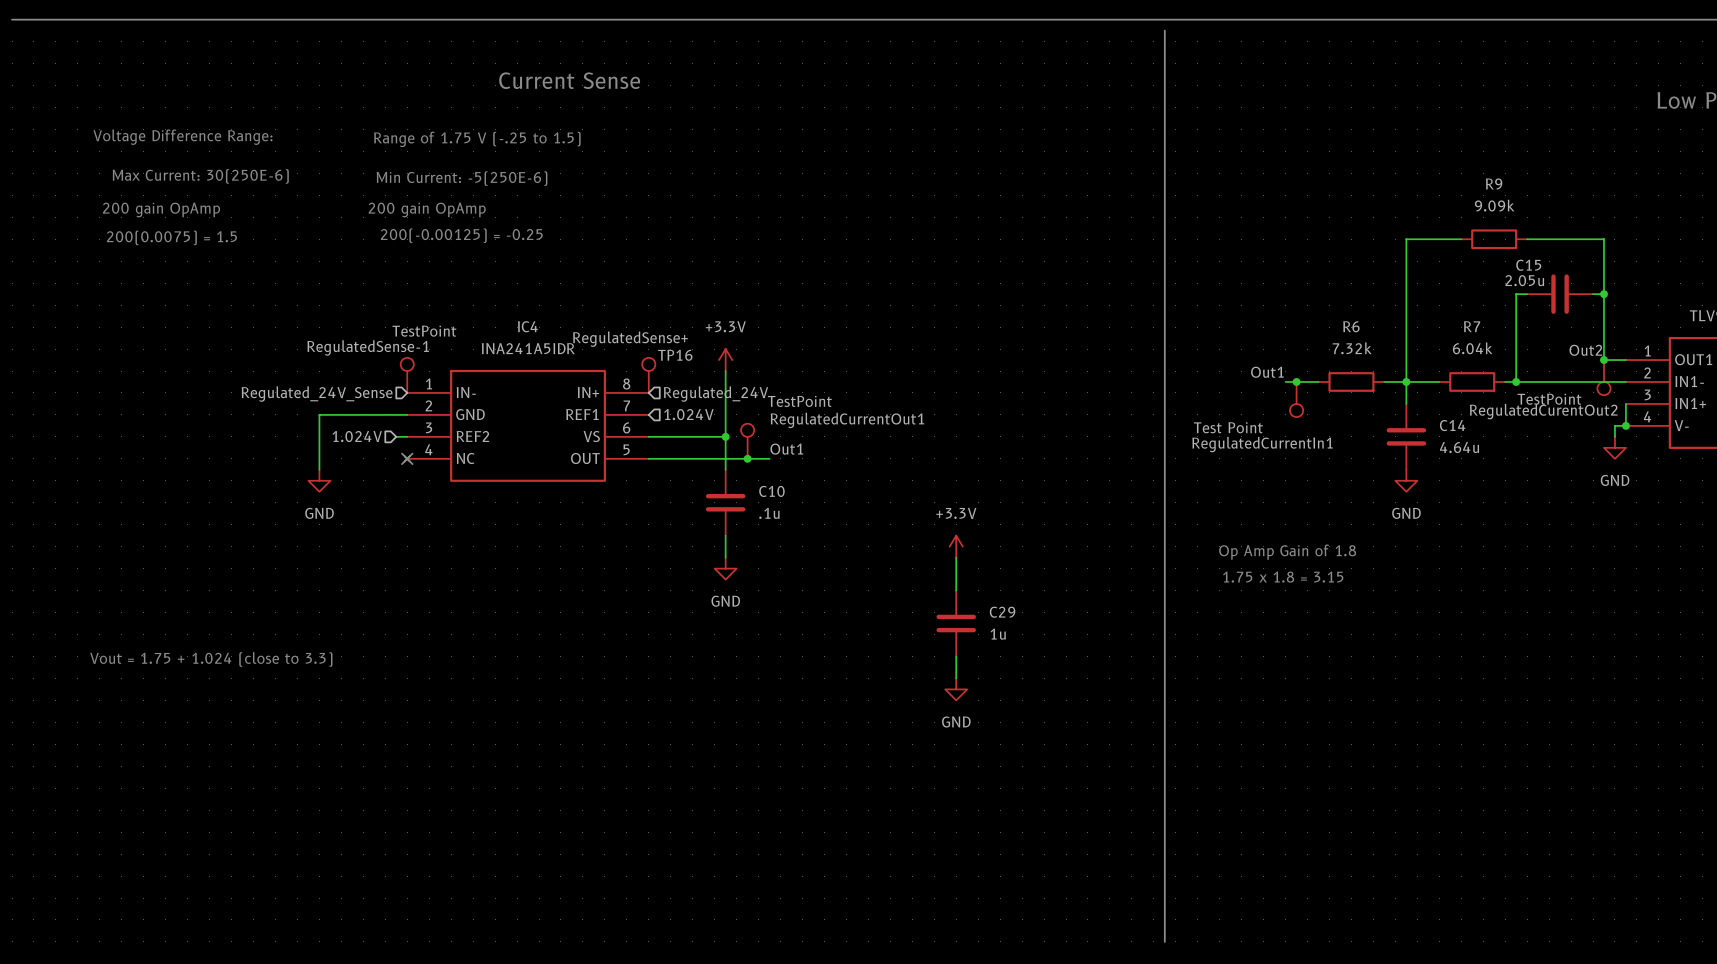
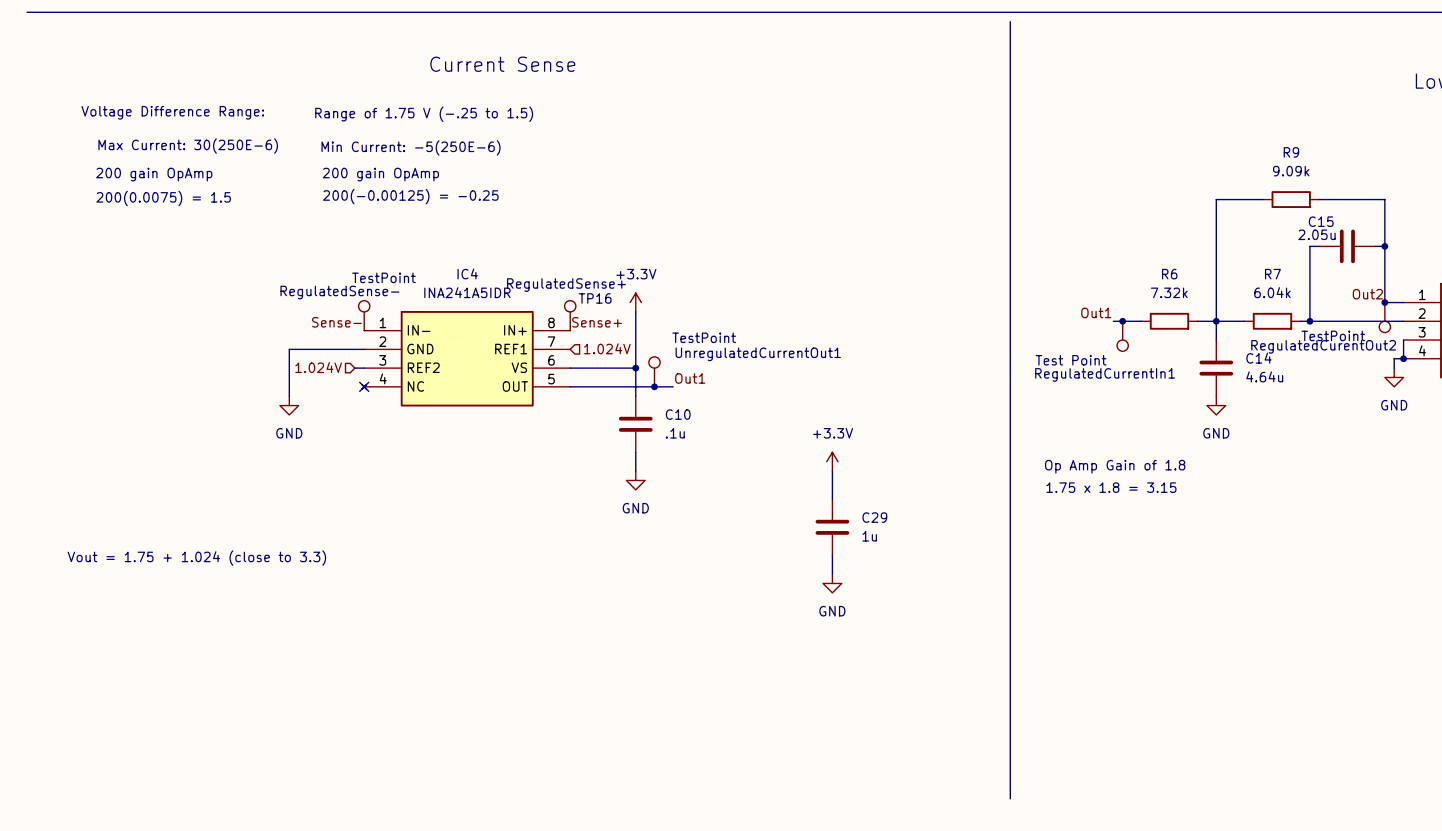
RegulatedSense-1 name: RegulatedSense-1 (368, 347) -> RegulatedSense- (339, 292)
label: none -> Sense- (336, 322)
label: none -> Sense+ (597, 322)
hierarchical label: Regulated_24V_Sense (317, 394) -> none
hierarchical label: Regulated_24V (715, 394) -> none
RegulatedCurrentOut1 name: RegulatedCurrentOut1 (847, 420) -> UnregulatedCurrentOut1 (758, 354)

